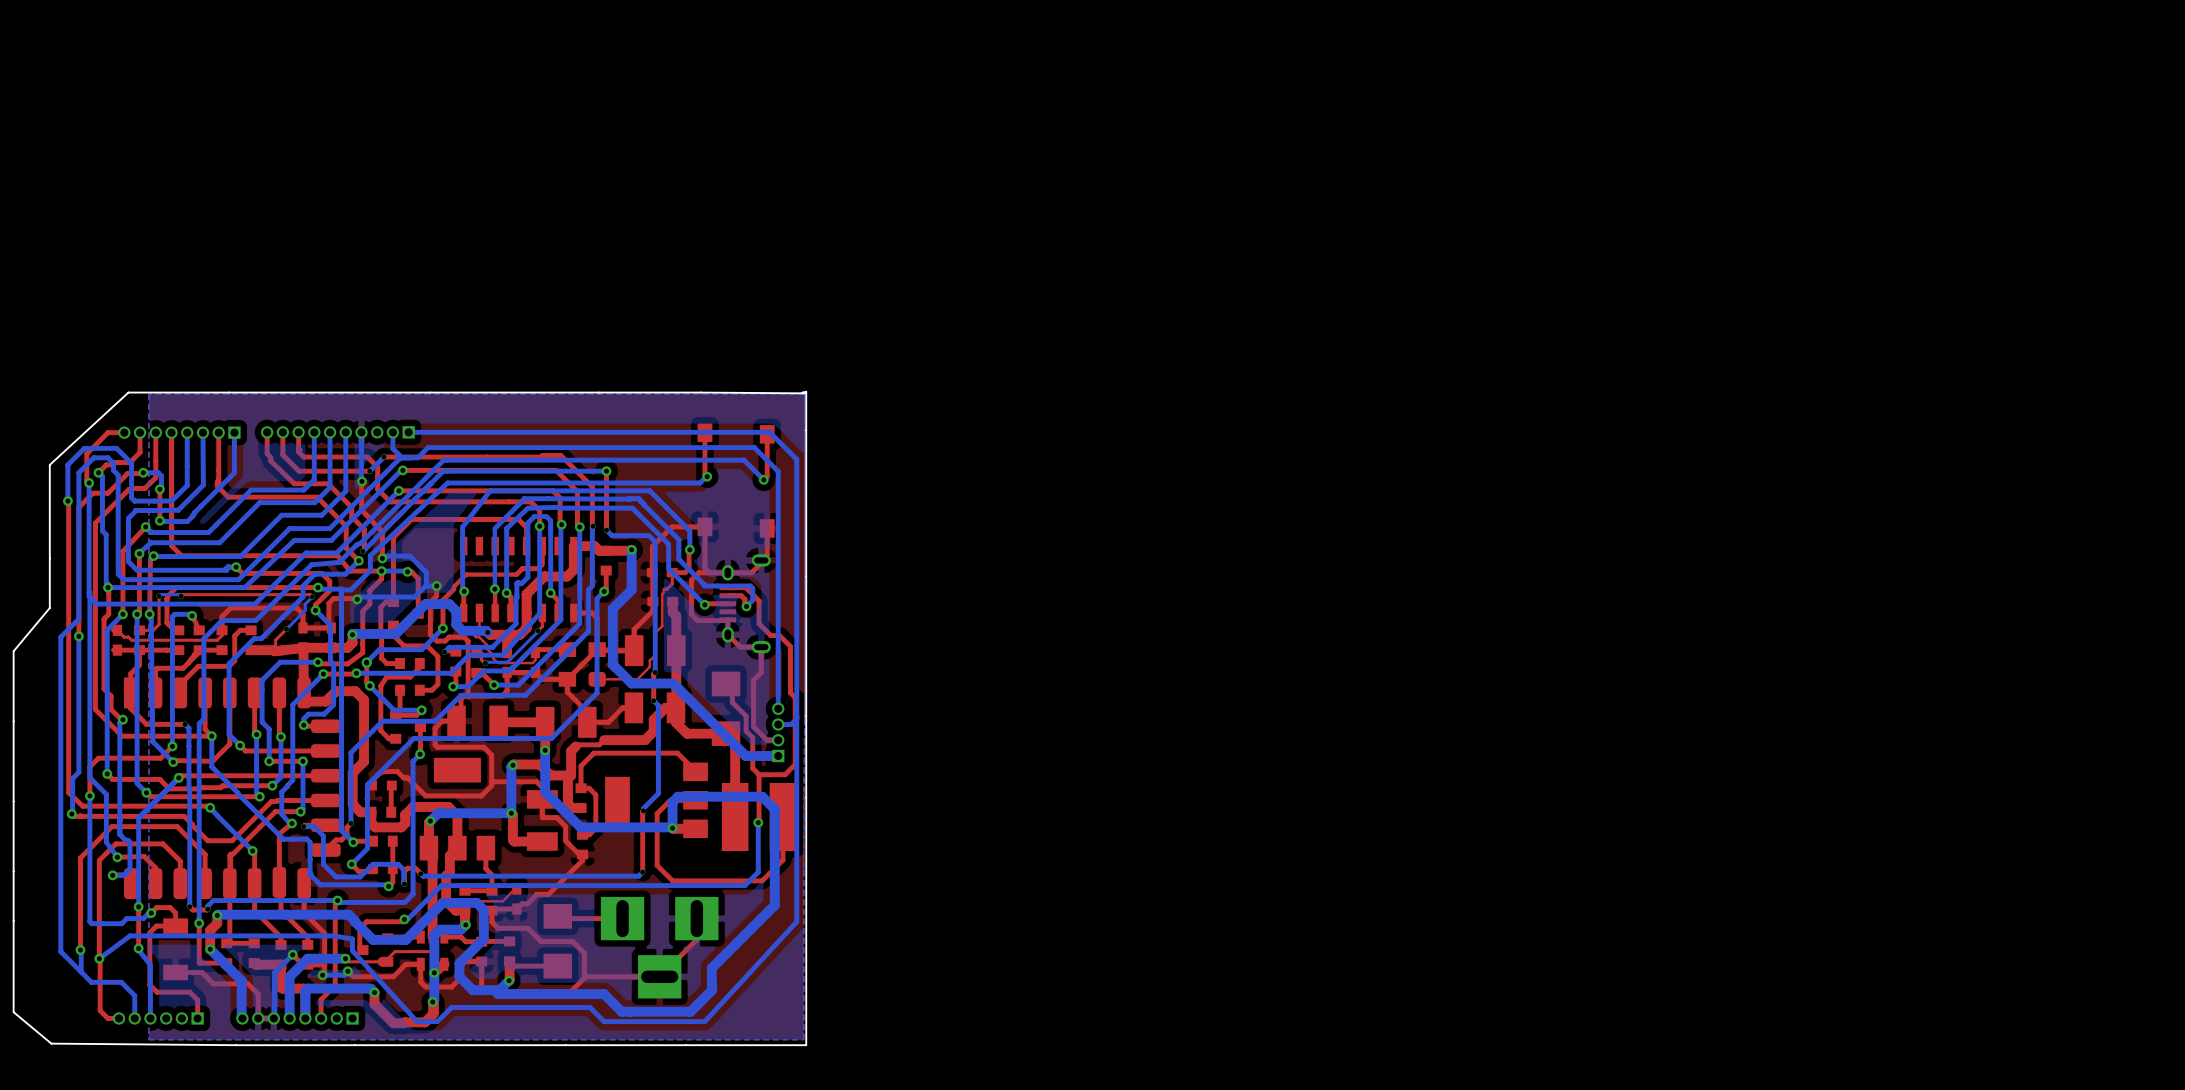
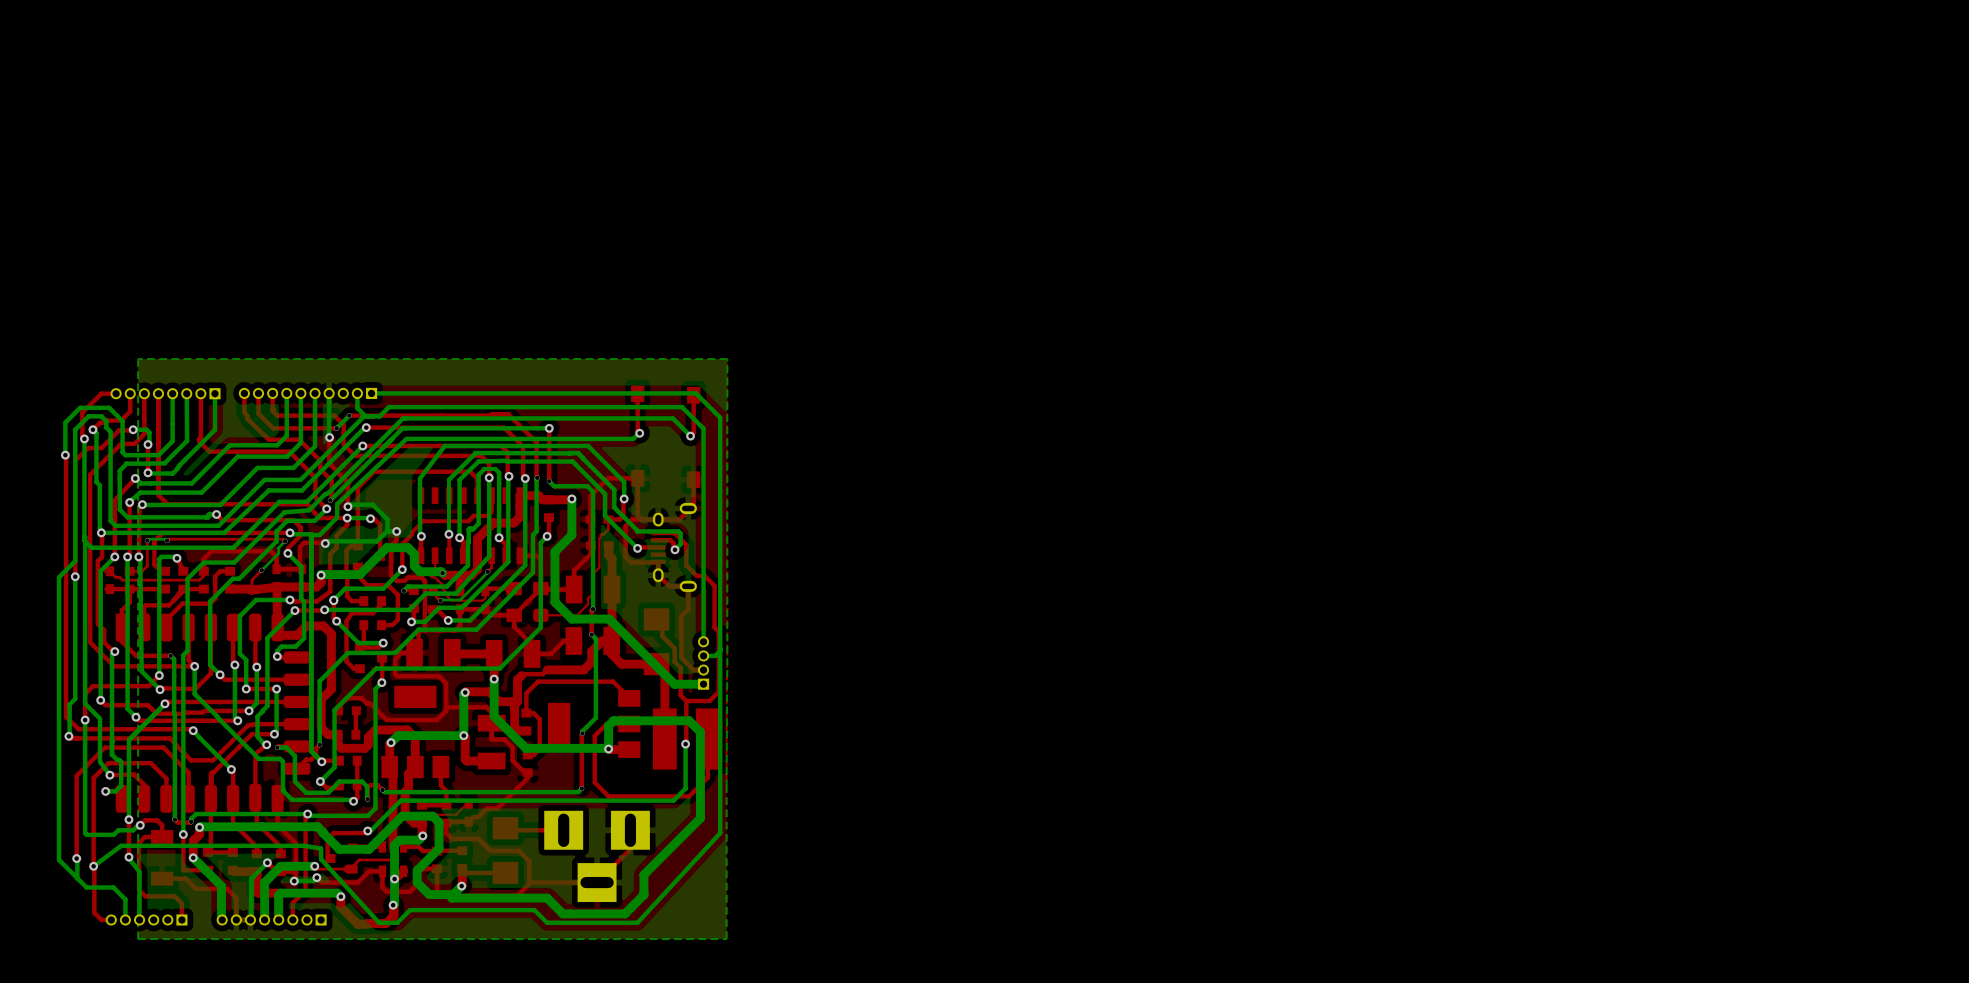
board edge: (802, 392) (806, 391) (806, 1045) (51, 1043) (13, 1012) (13, 651) (49, 608) (49, 464) (128, 392) (804, 393) -> none

